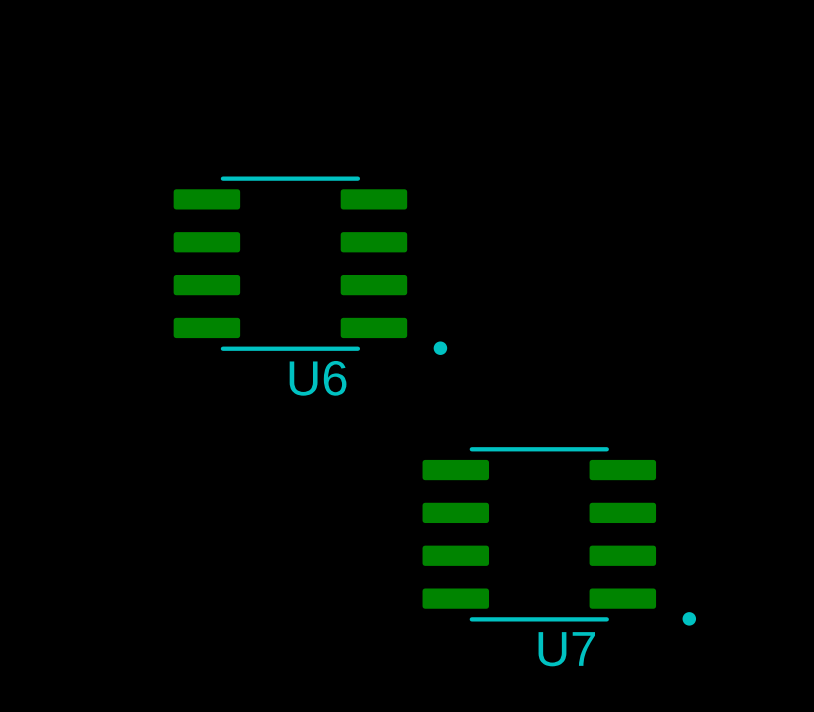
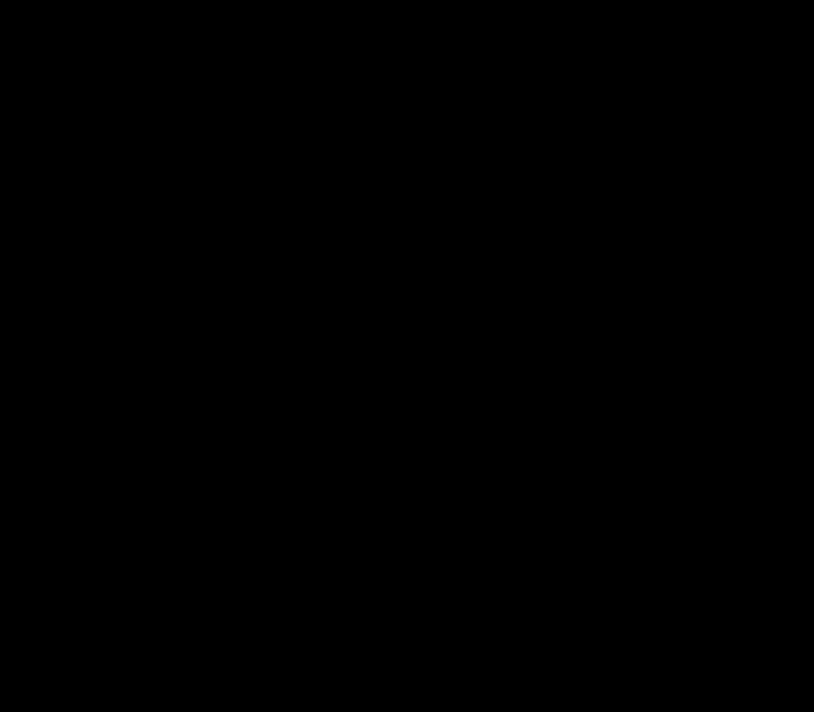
U6: (310, 265) -> none
U7: (559, 536) -> none

